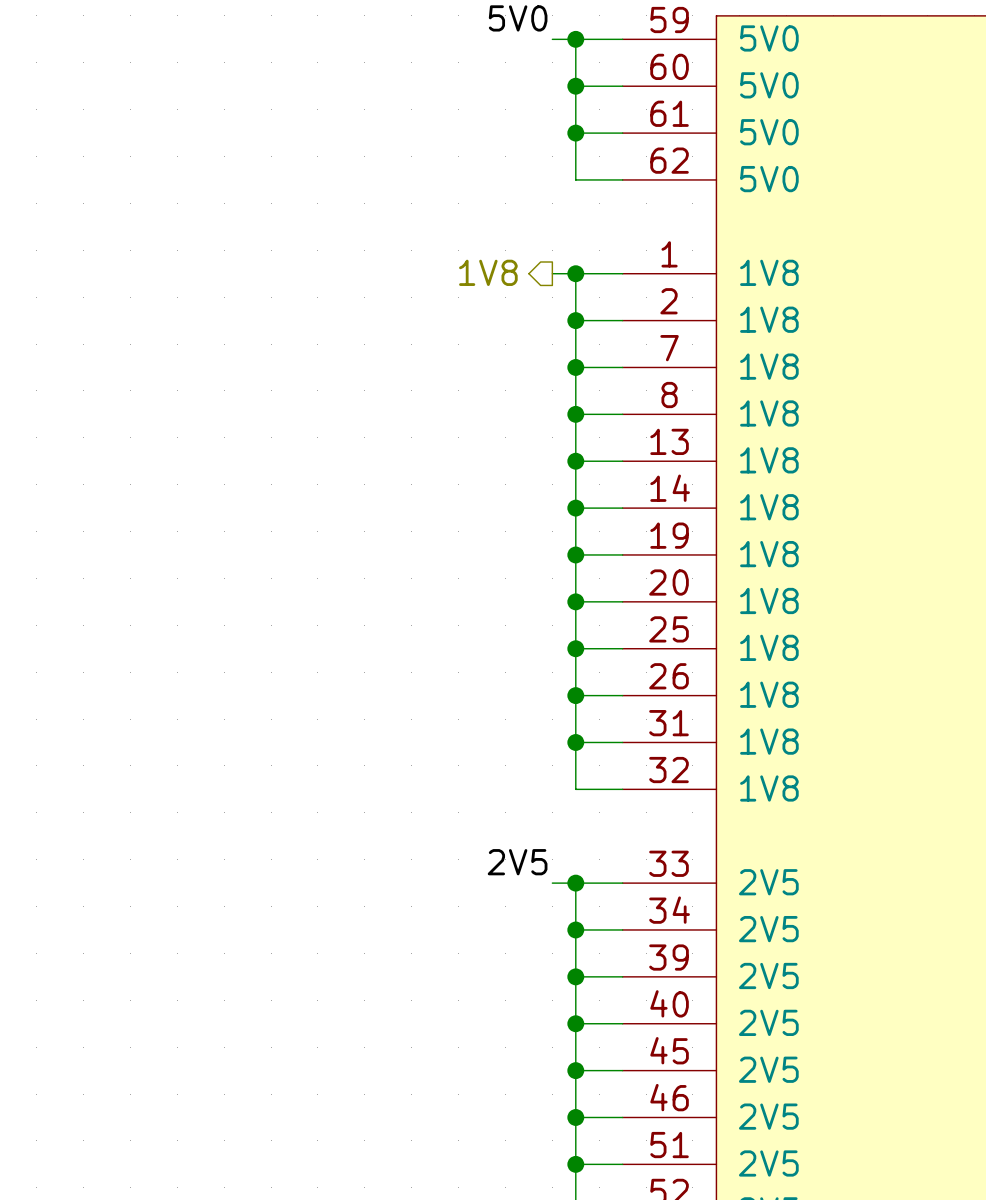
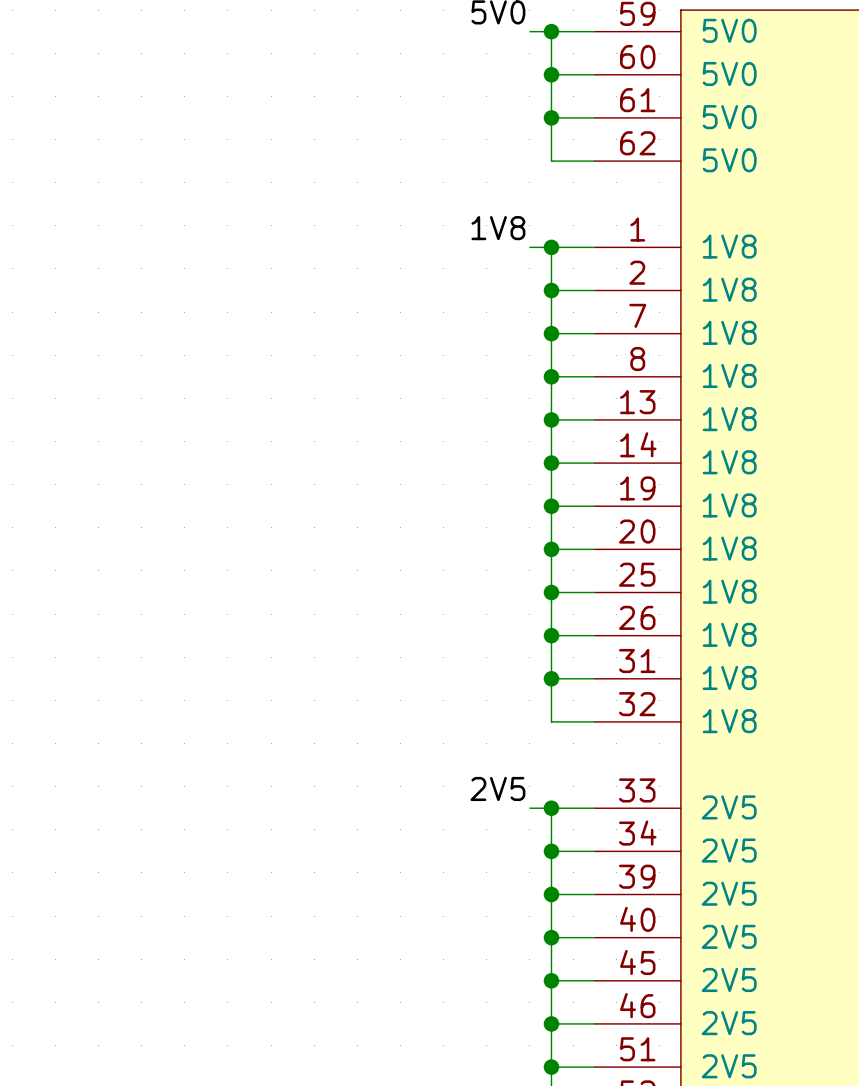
label: none -> 1V8 (498, 228)
hierarchical label: 1V8 (488, 272) -> none

